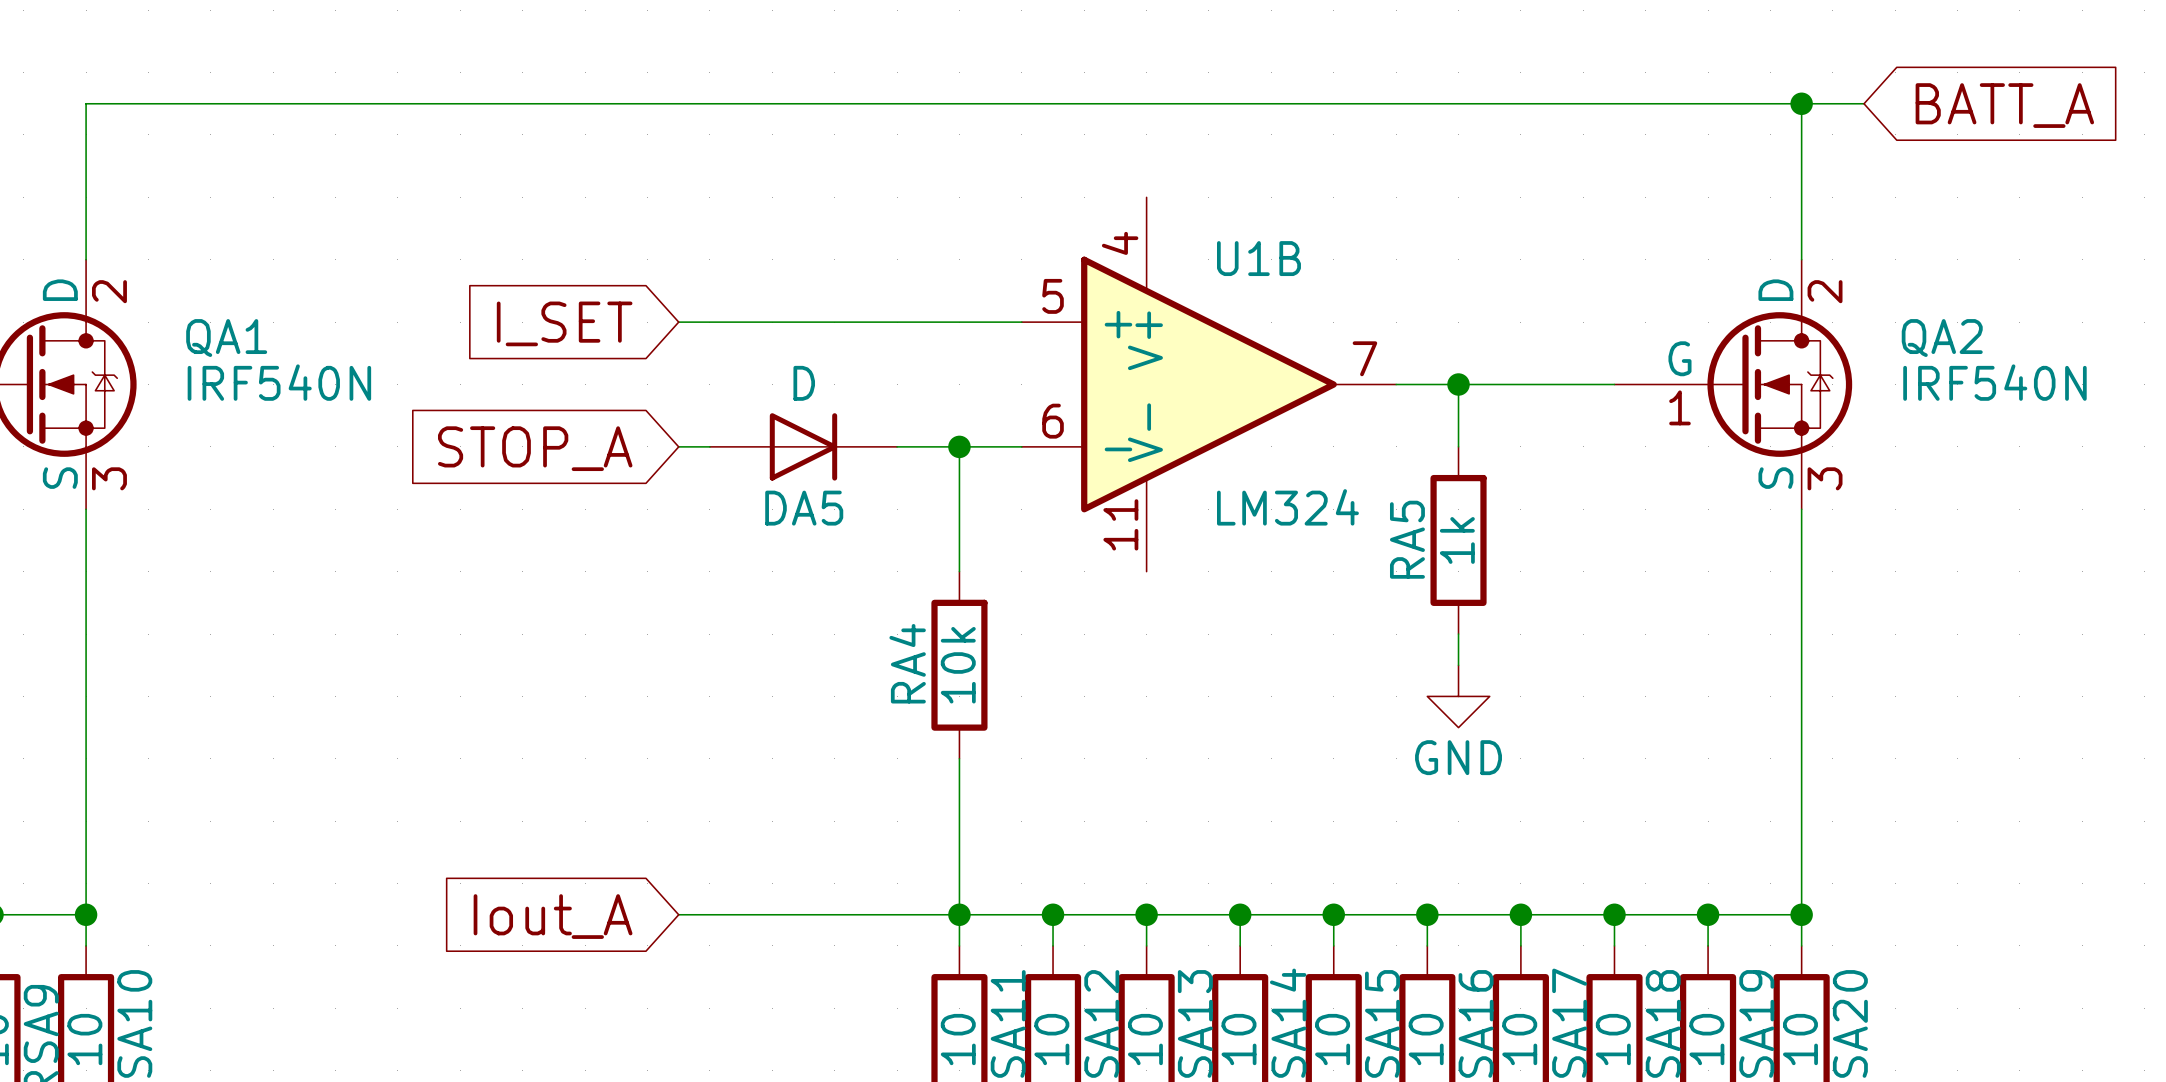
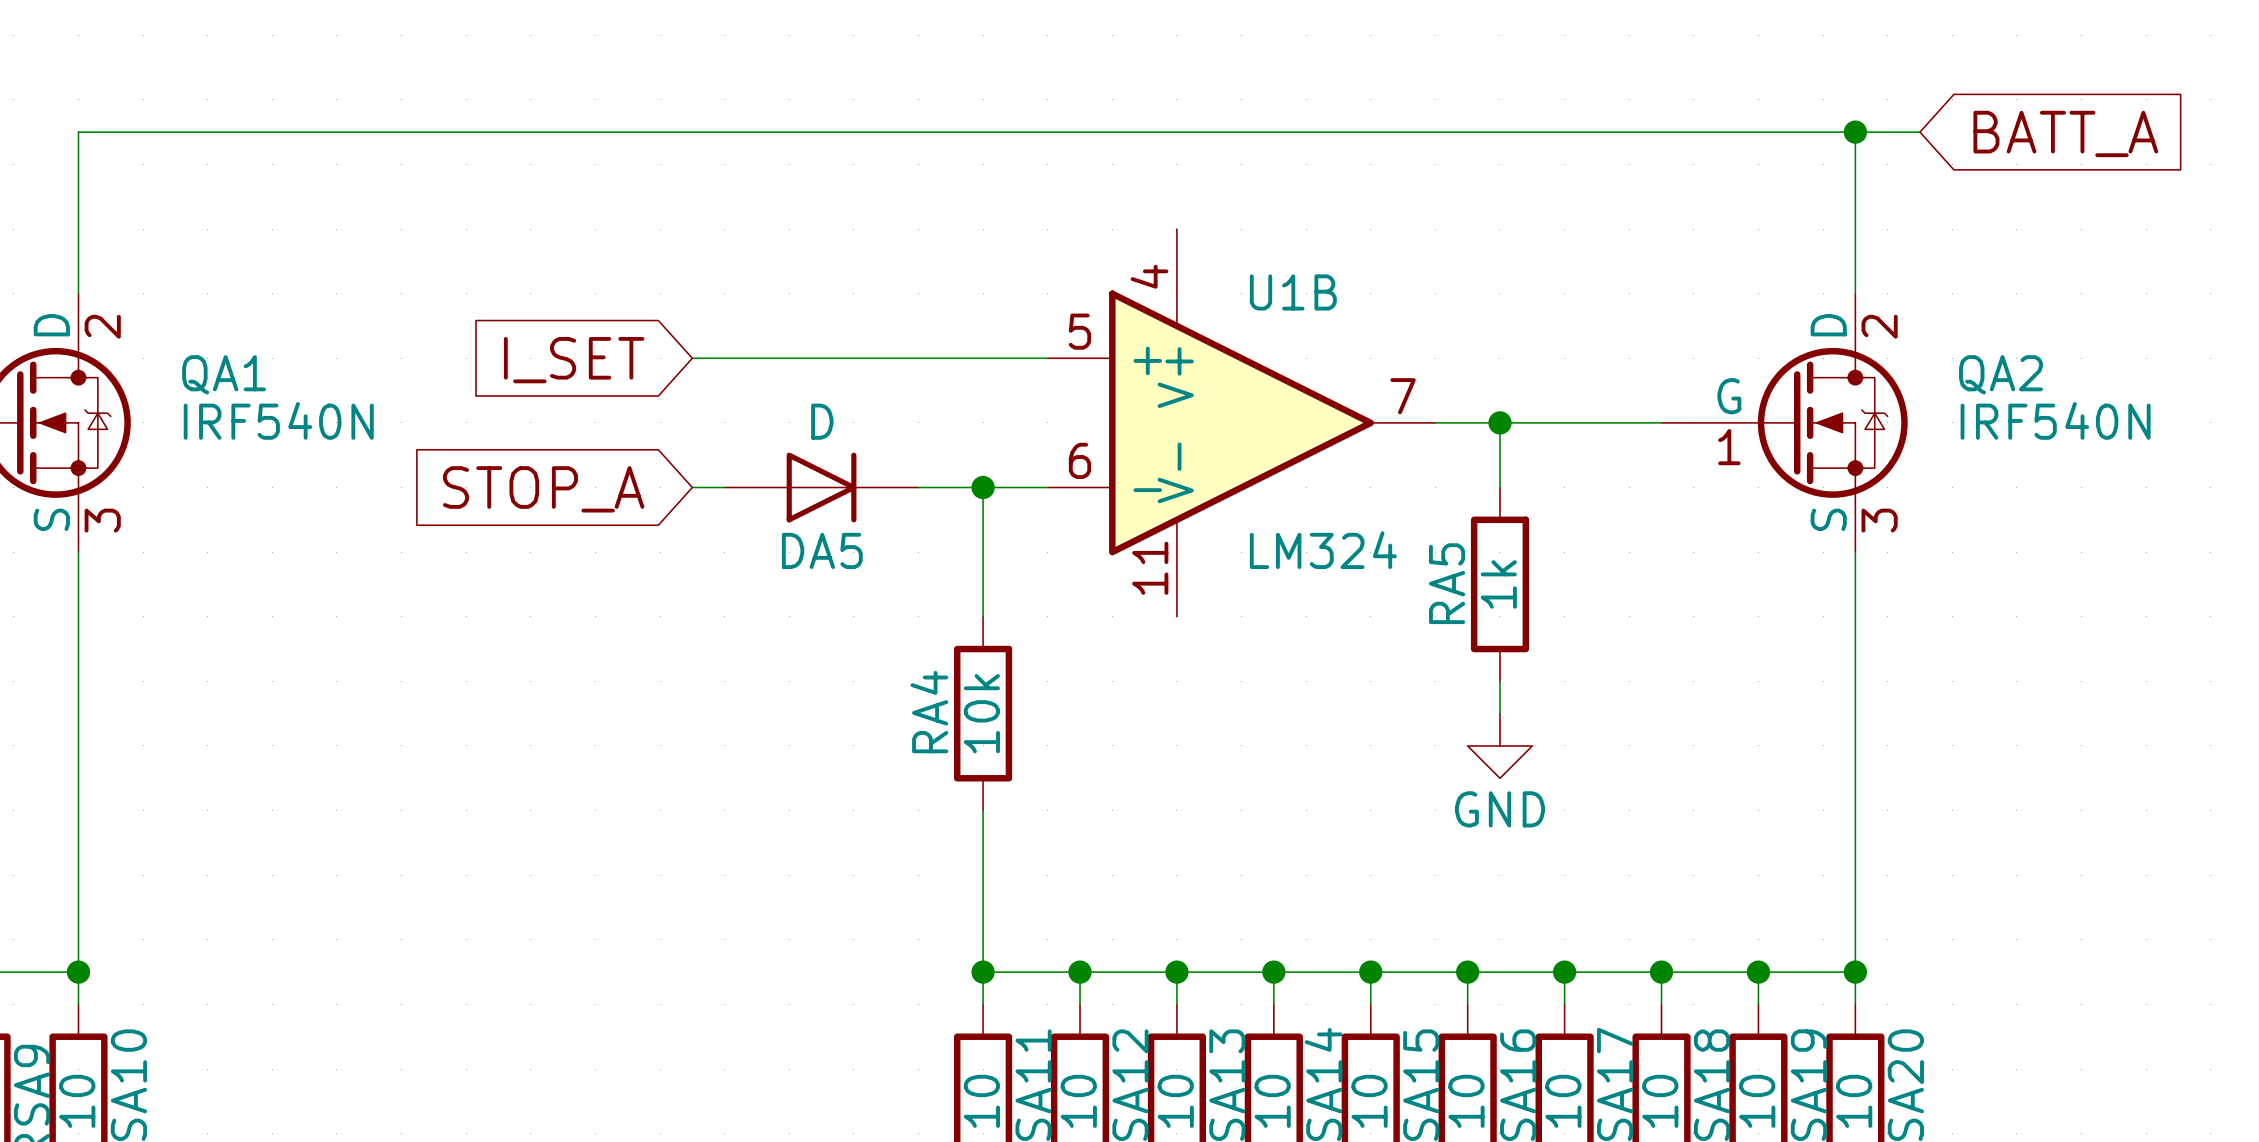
wire: (678, 914) (959, 914) -> none
global label: Iout_A (553, 916) -> none

